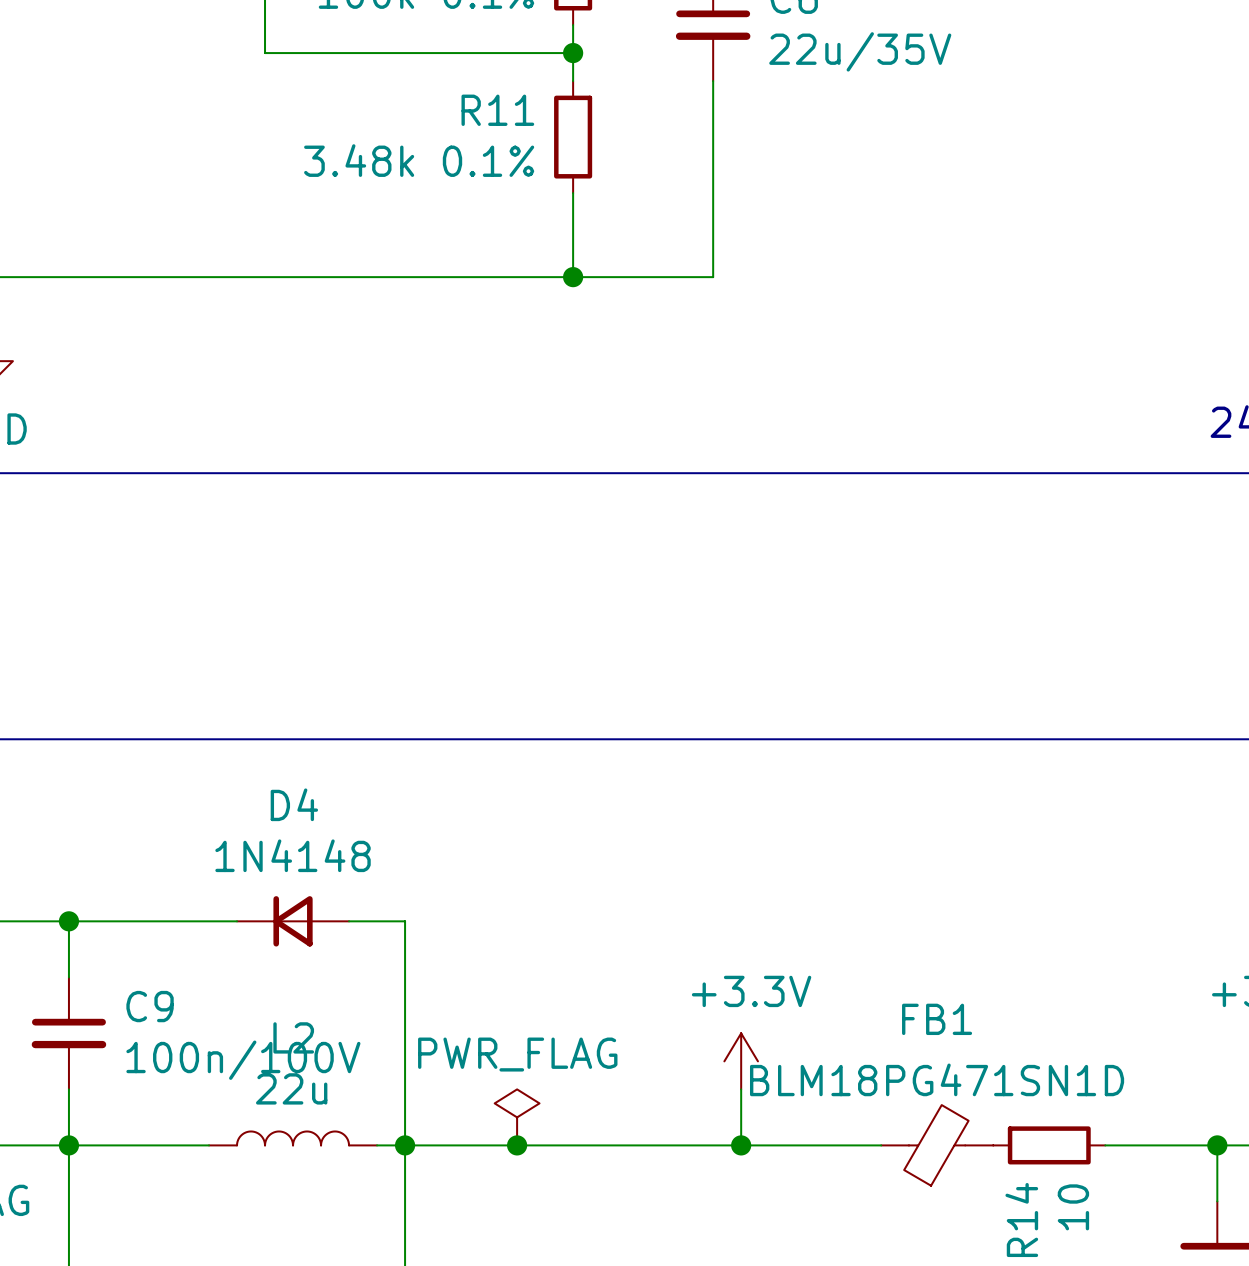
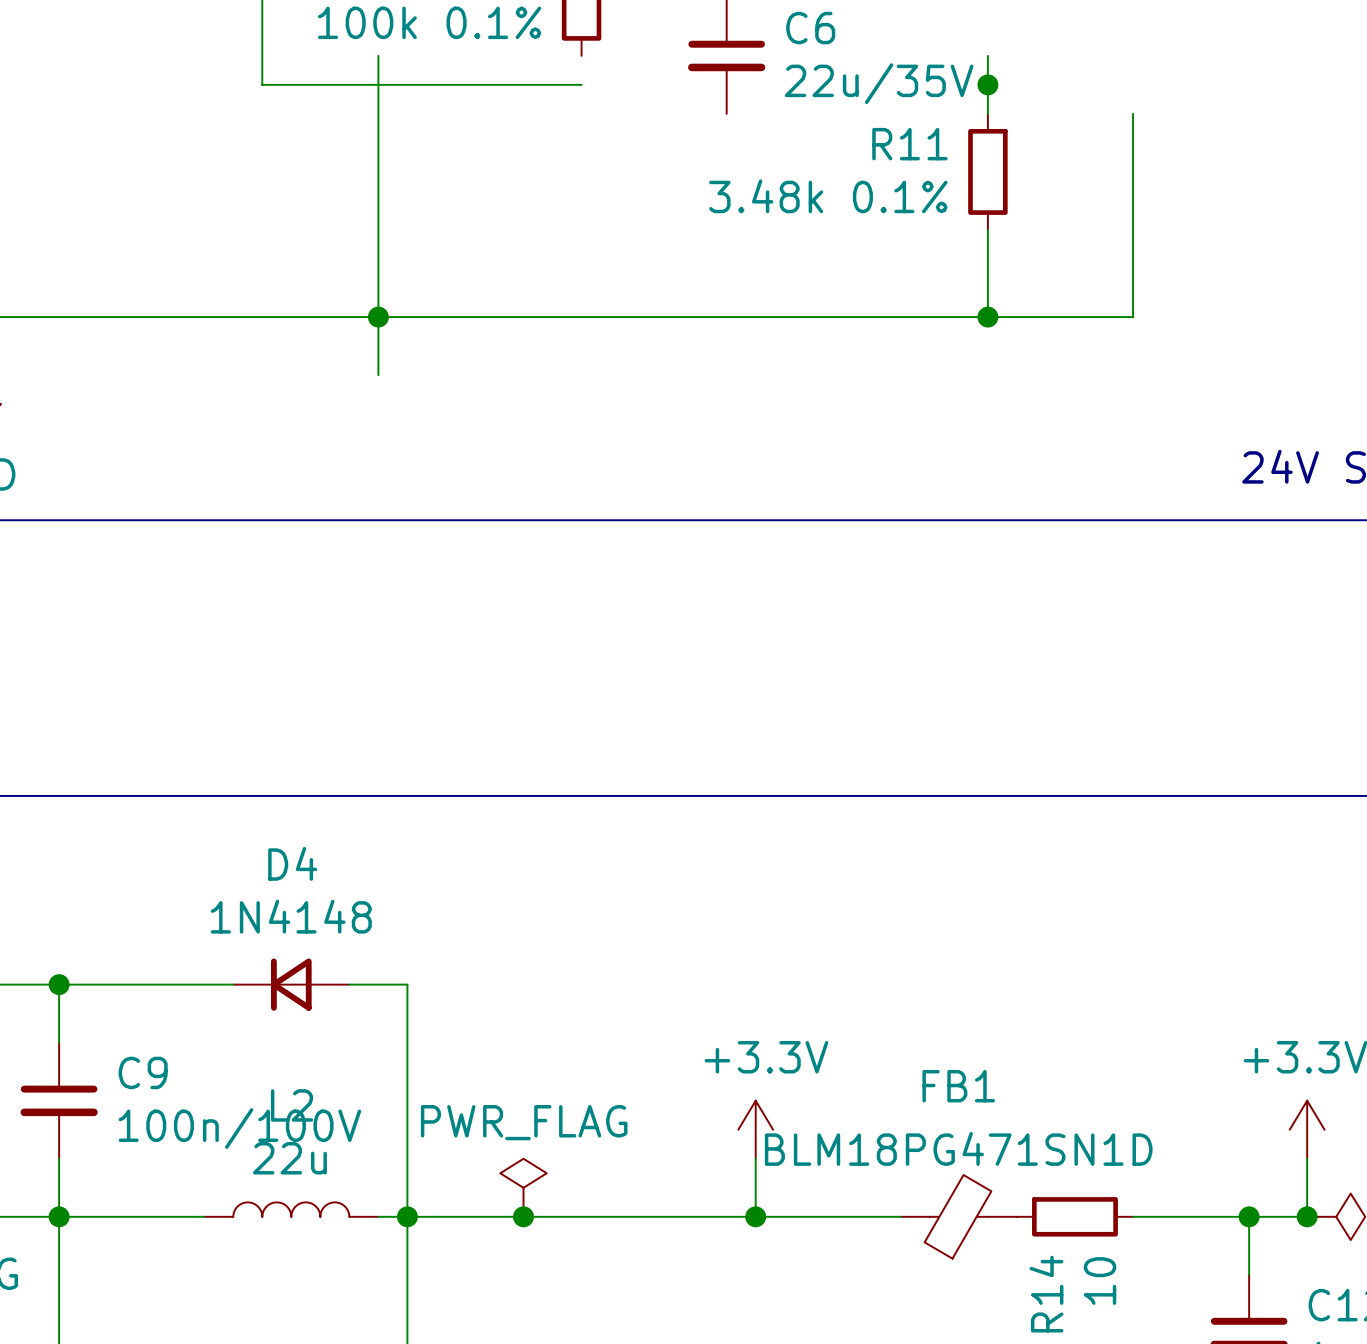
wire: none -> (378, 55) (378, 375)
wire: (573, 25) (573, 81) -> (987, 55) (987, 113)
junction: (573, 53) -> none
junction: none -> (987, 84)
wire: (713, 81) (713, 277) -> (1133, 113) (1133, 317) (726, 317)
R11 position: (573, 137) -> (987, 171)
wire: (573, 193) (573, 277) -> (987, 229) (987, 317)
junction: none -> (378, 317)
junction: (573, 277) -> none
junction: none -> (987, 317)

